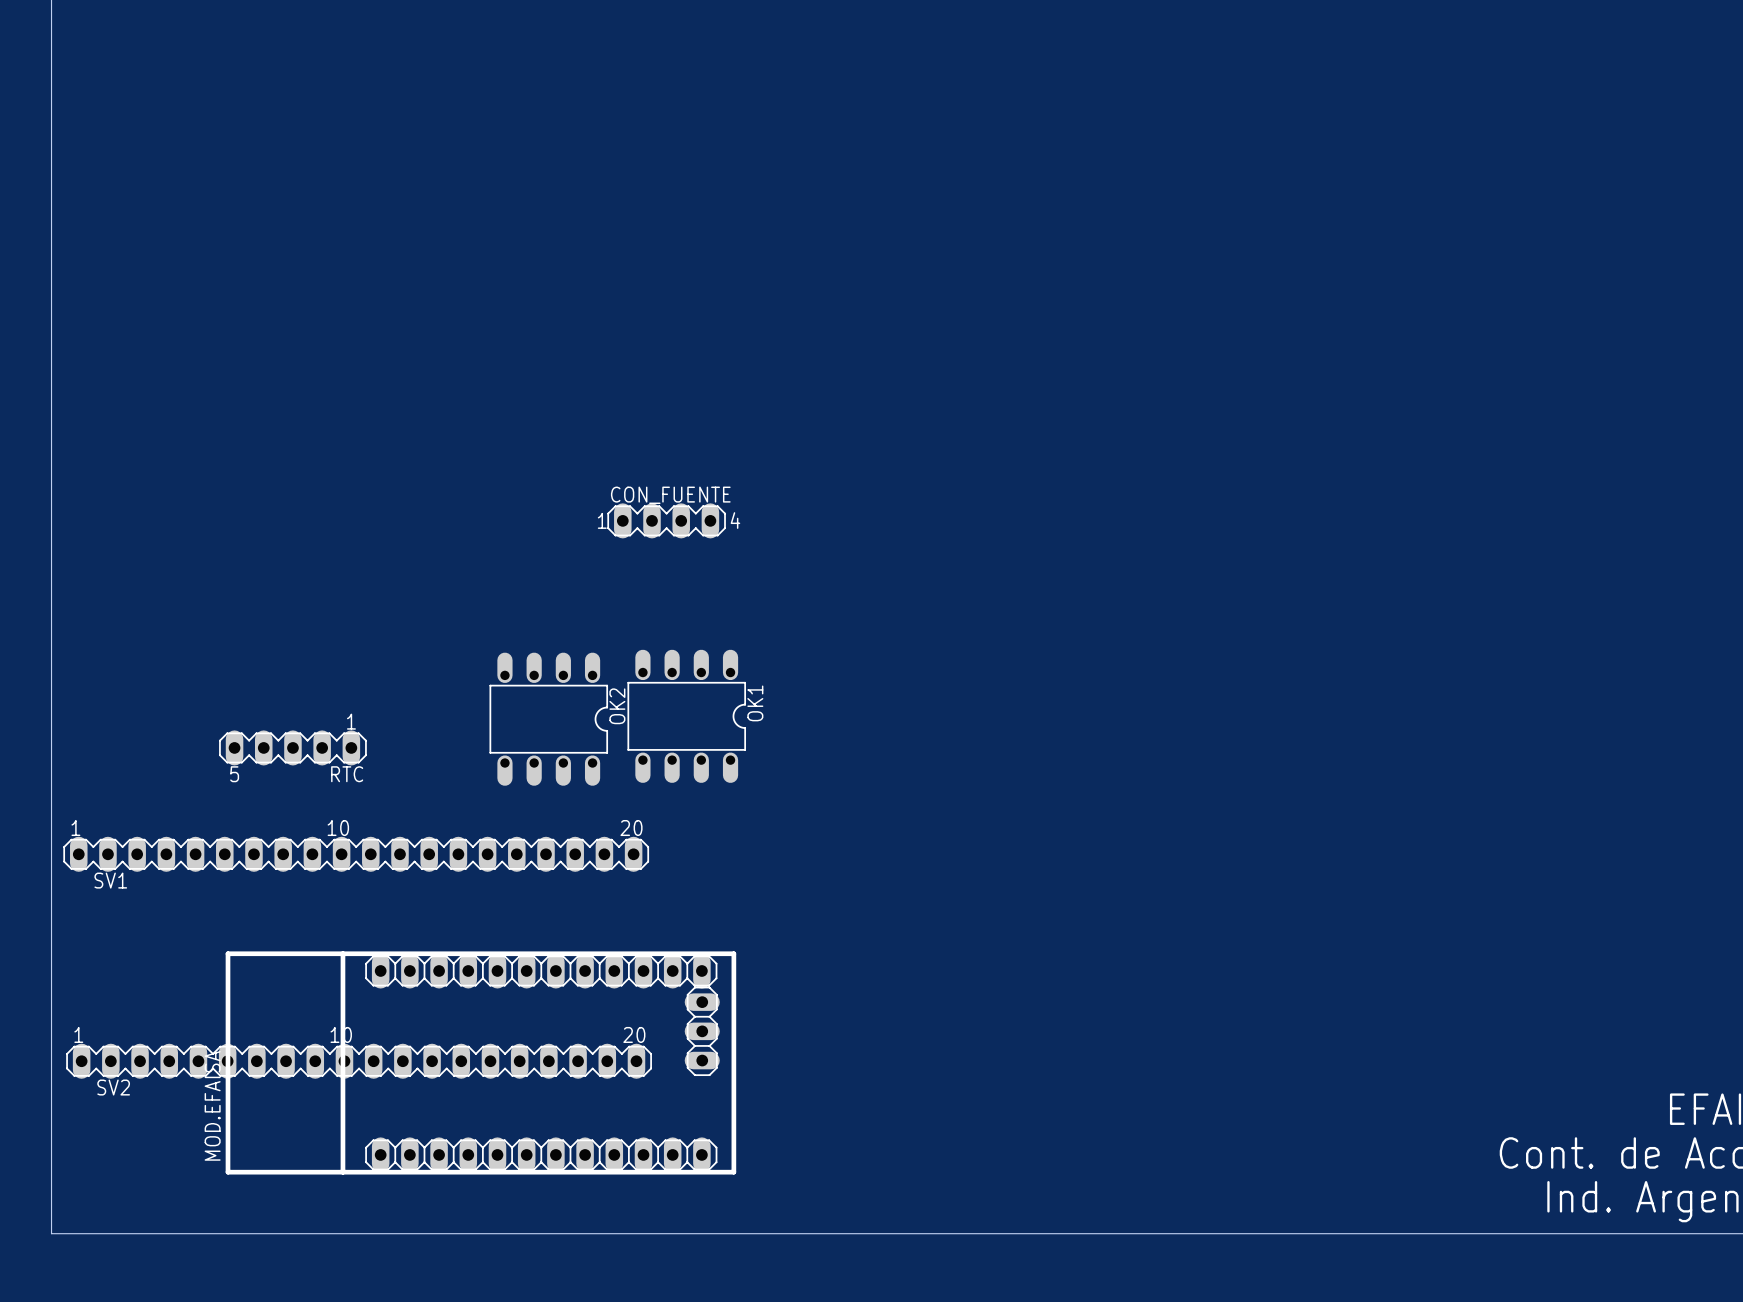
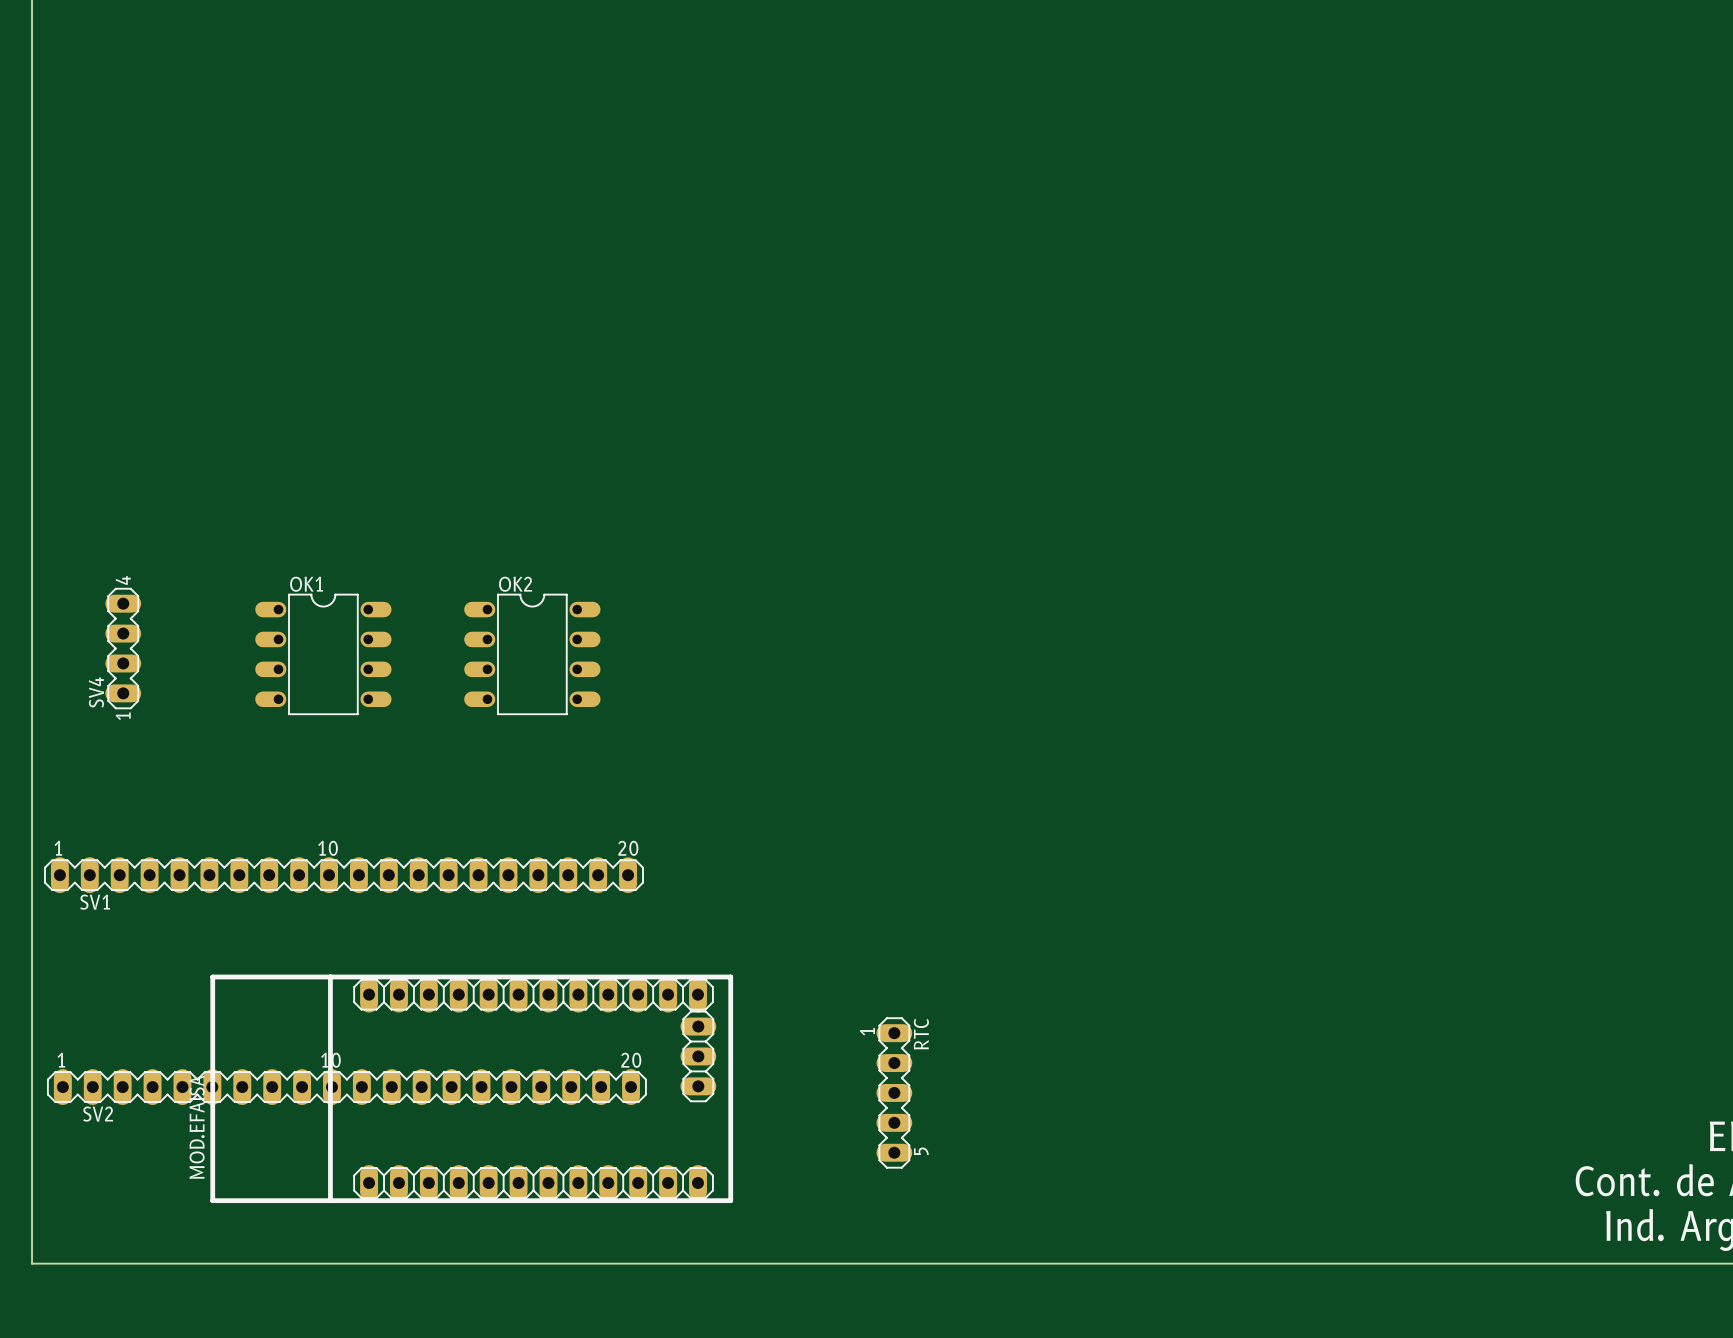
CON_FUENTE: (666, 520) -> none
SV4: none -> (123, 648)
OK1 rotation: 0° (686, 716) -> 90° counterclockwise (323, 654)
OK1 position: (686, 716) -> (323, 654)
OK2 rotation: 0° (548, 719) -> 90° counterclockwise (532, 654)
OK2 position: (548, 719) -> (532, 654)
RTC: (292, 747) -> none
RTC: none -> (894, 1092)

